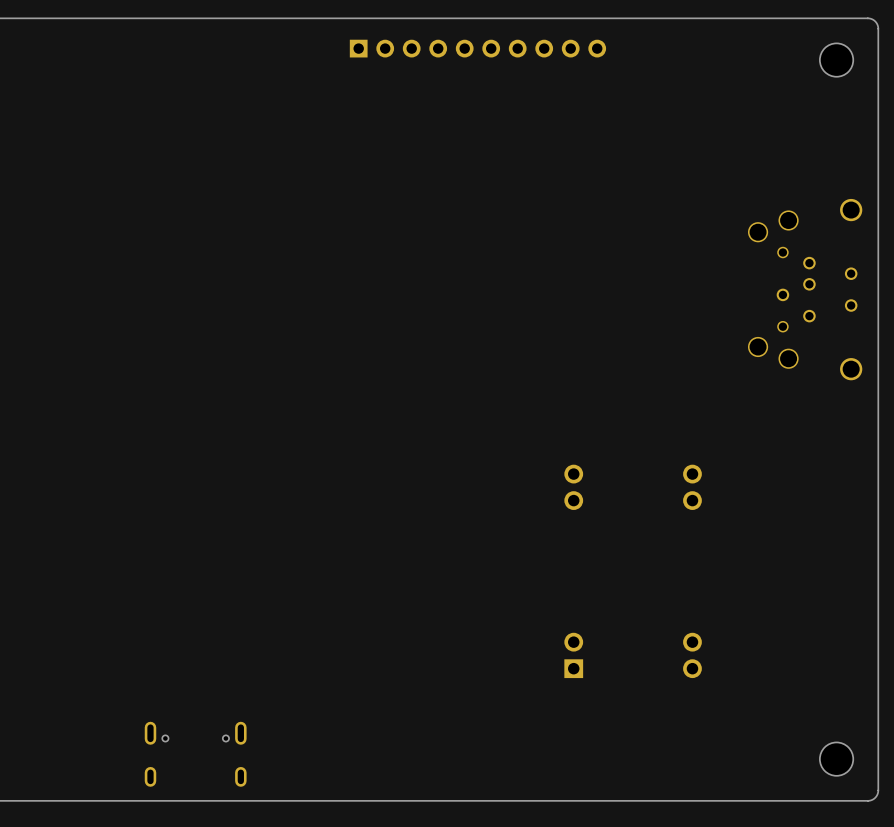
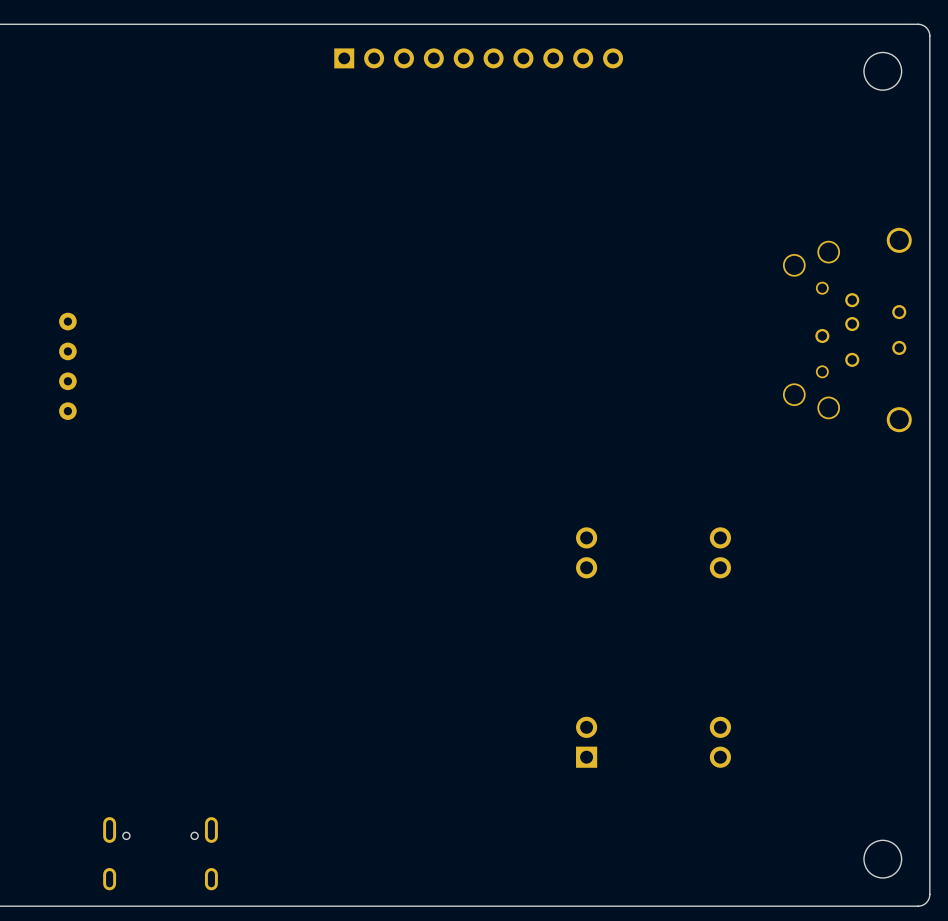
part: none -> (67, 321)
part: none -> (67, 351)
part: none -> (67, 381)
part: none -> (67, 411)

